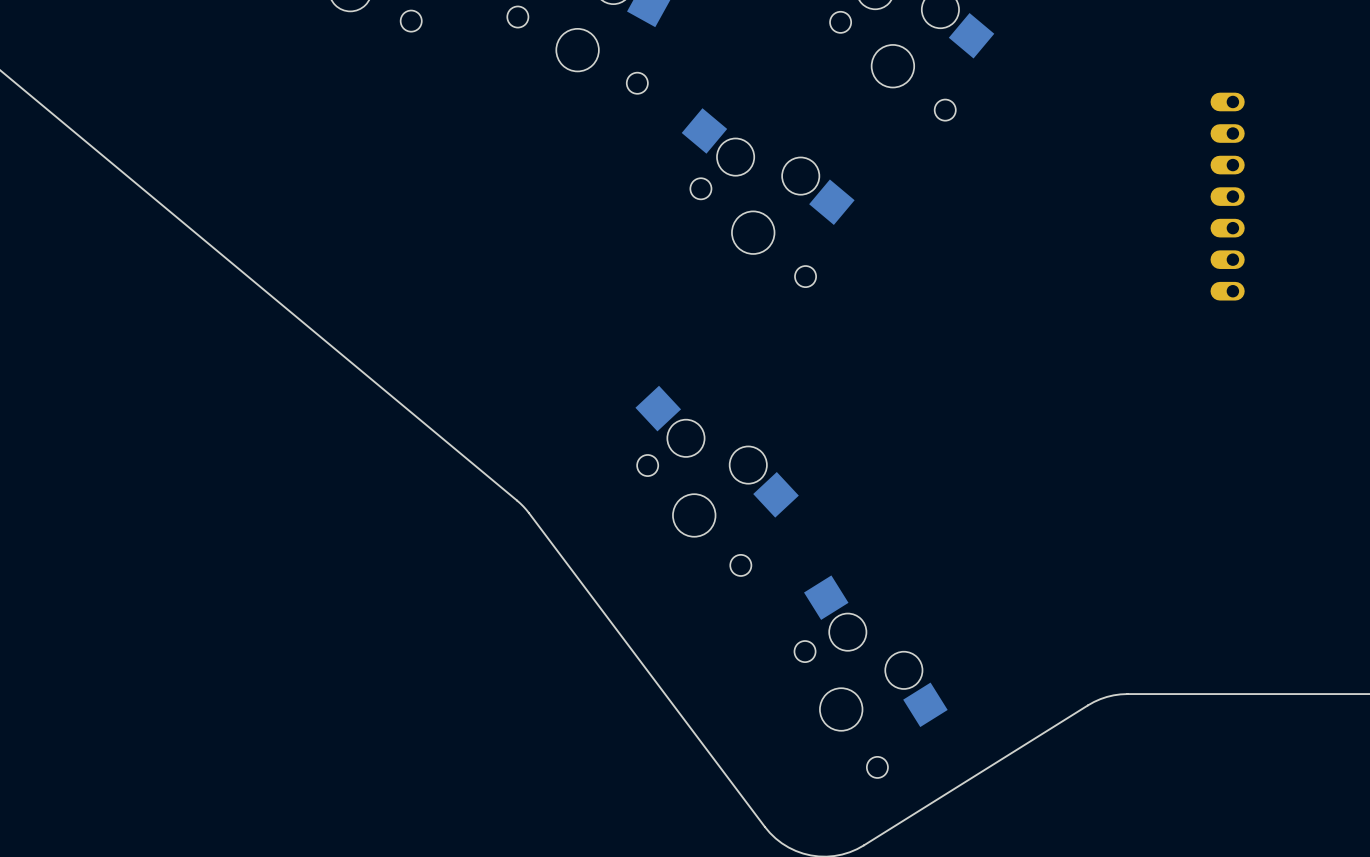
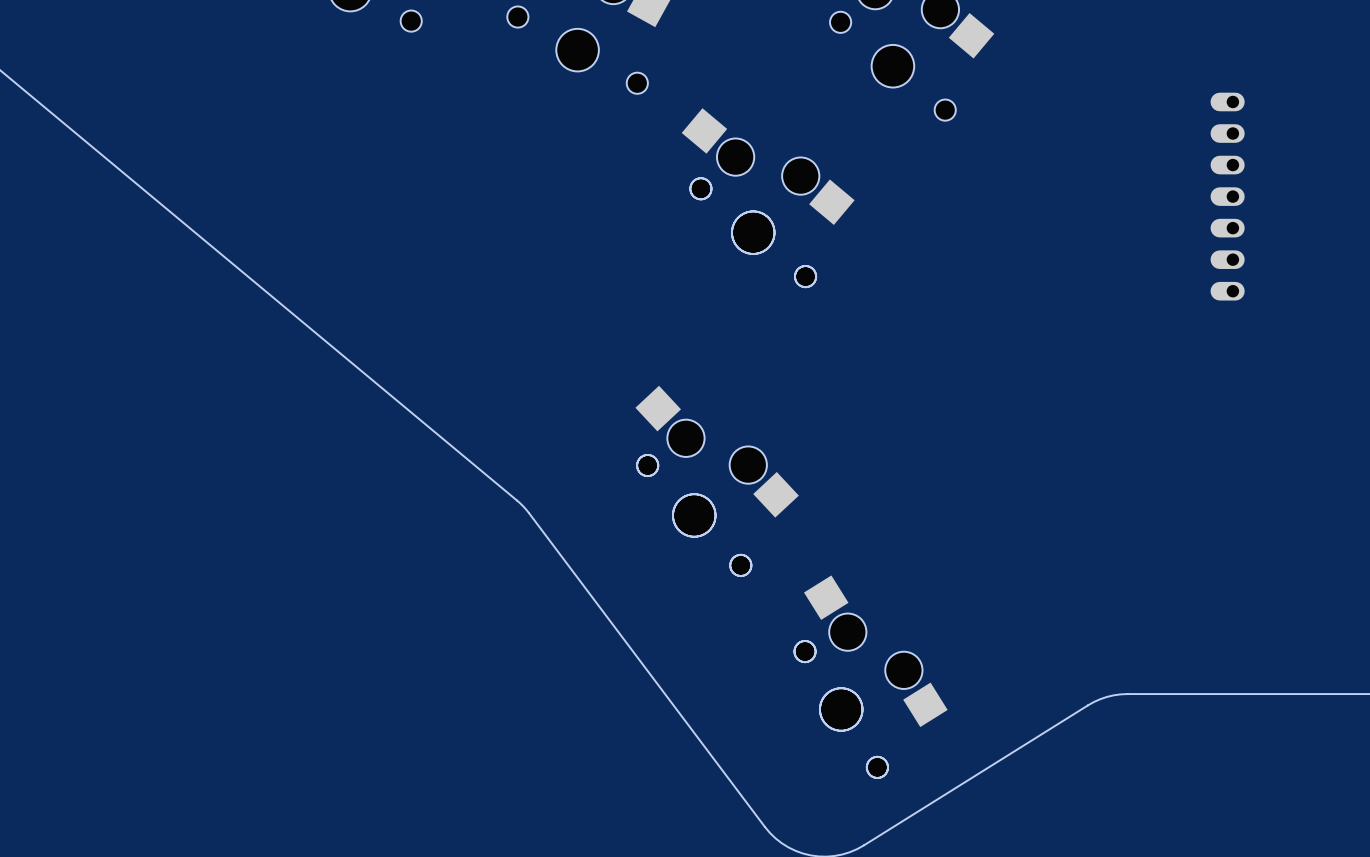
part: none -> (753, 215)
part: none -> (698, 500)
part: none -> (855, 698)

